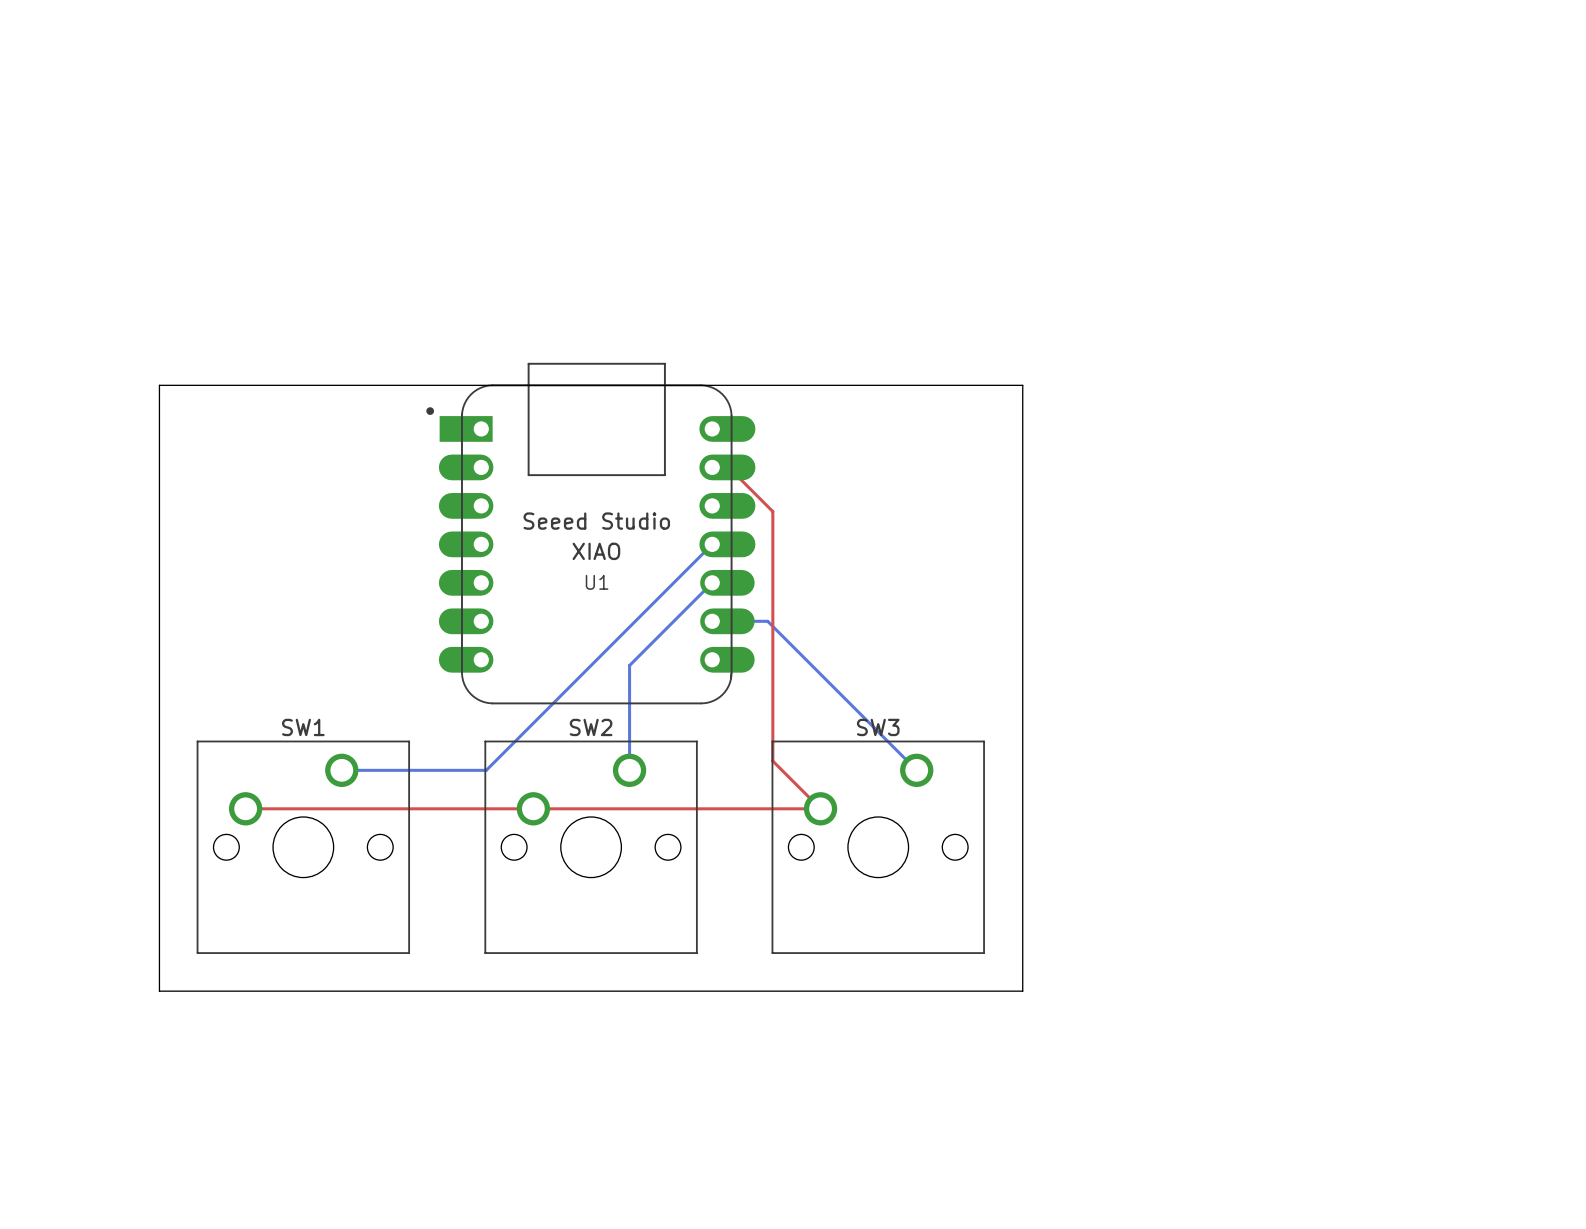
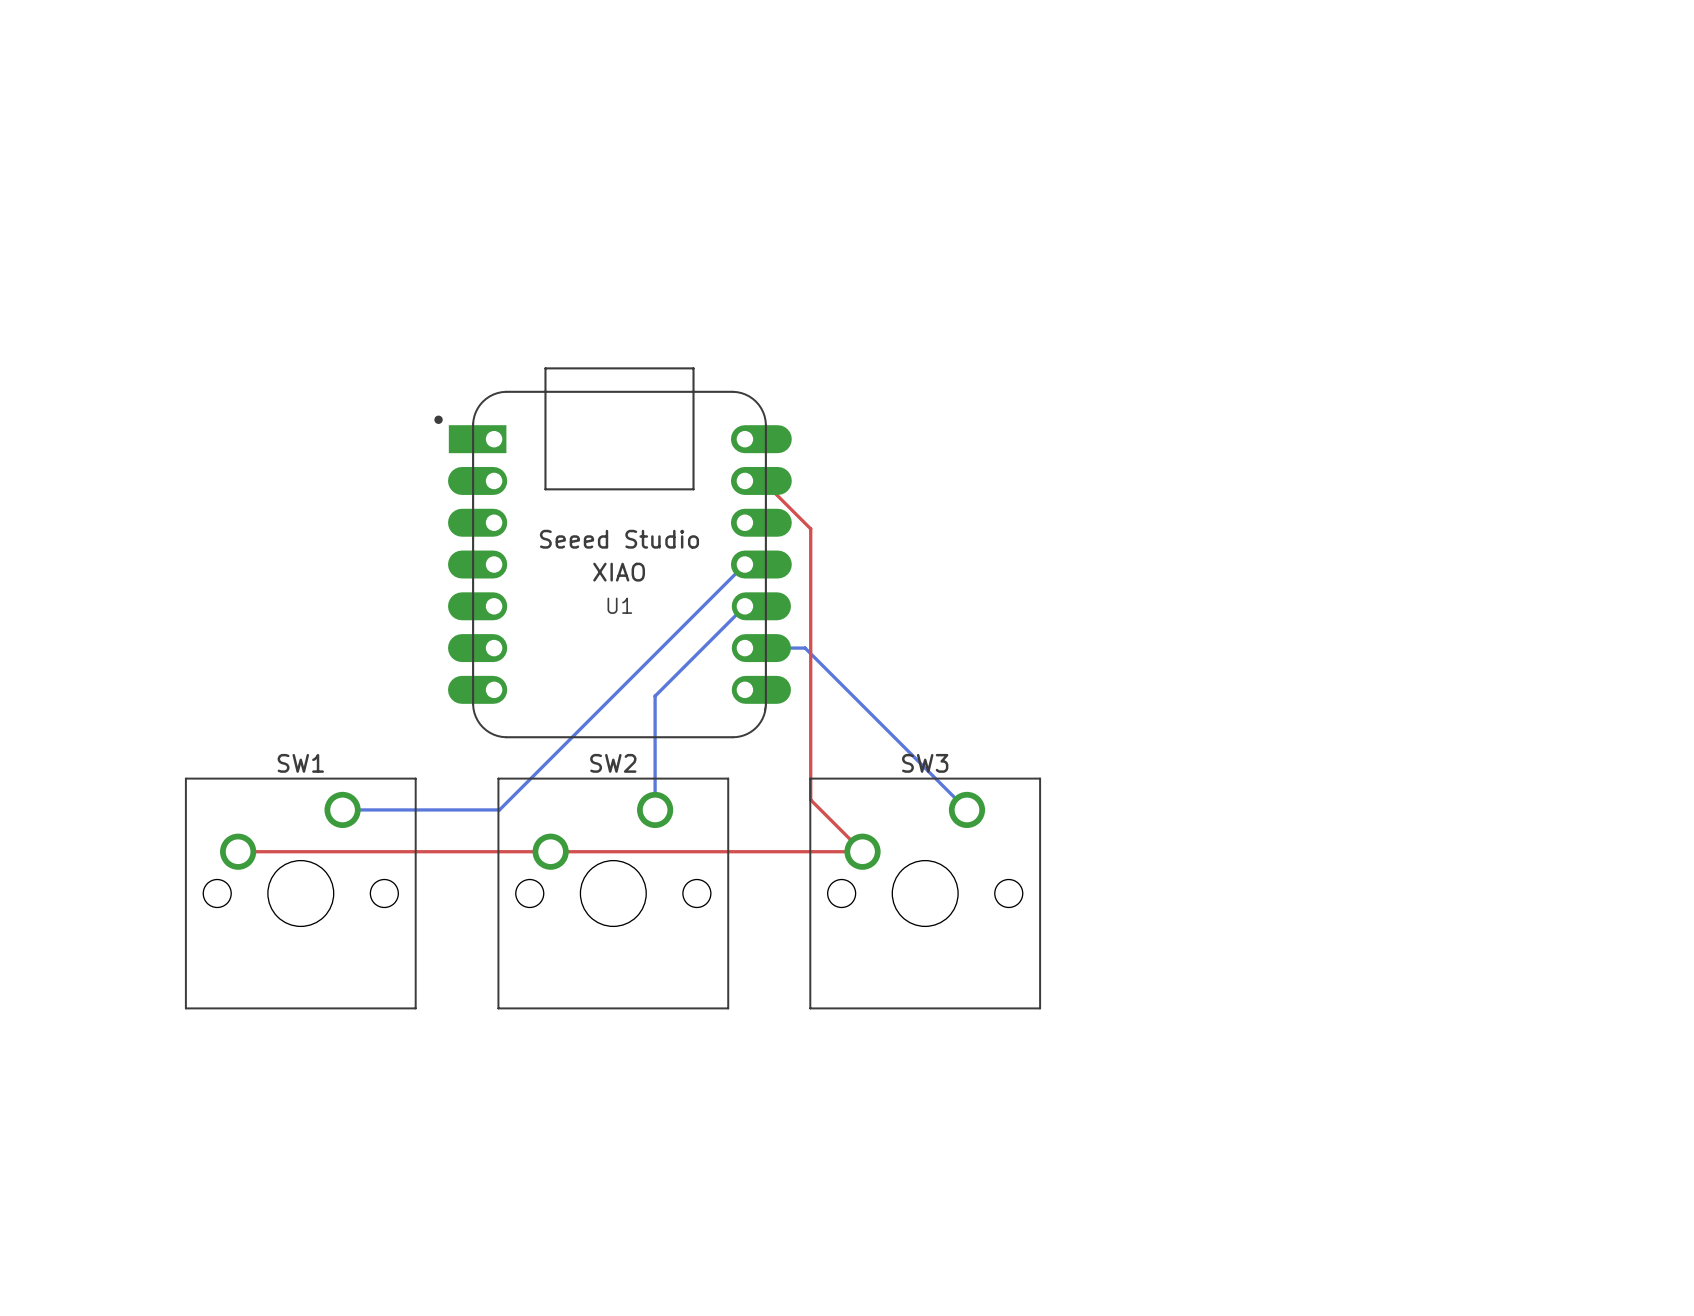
board edge: (159, 385) (1022, 385) (1022, 991) (159, 991) (159, 385) -> none

